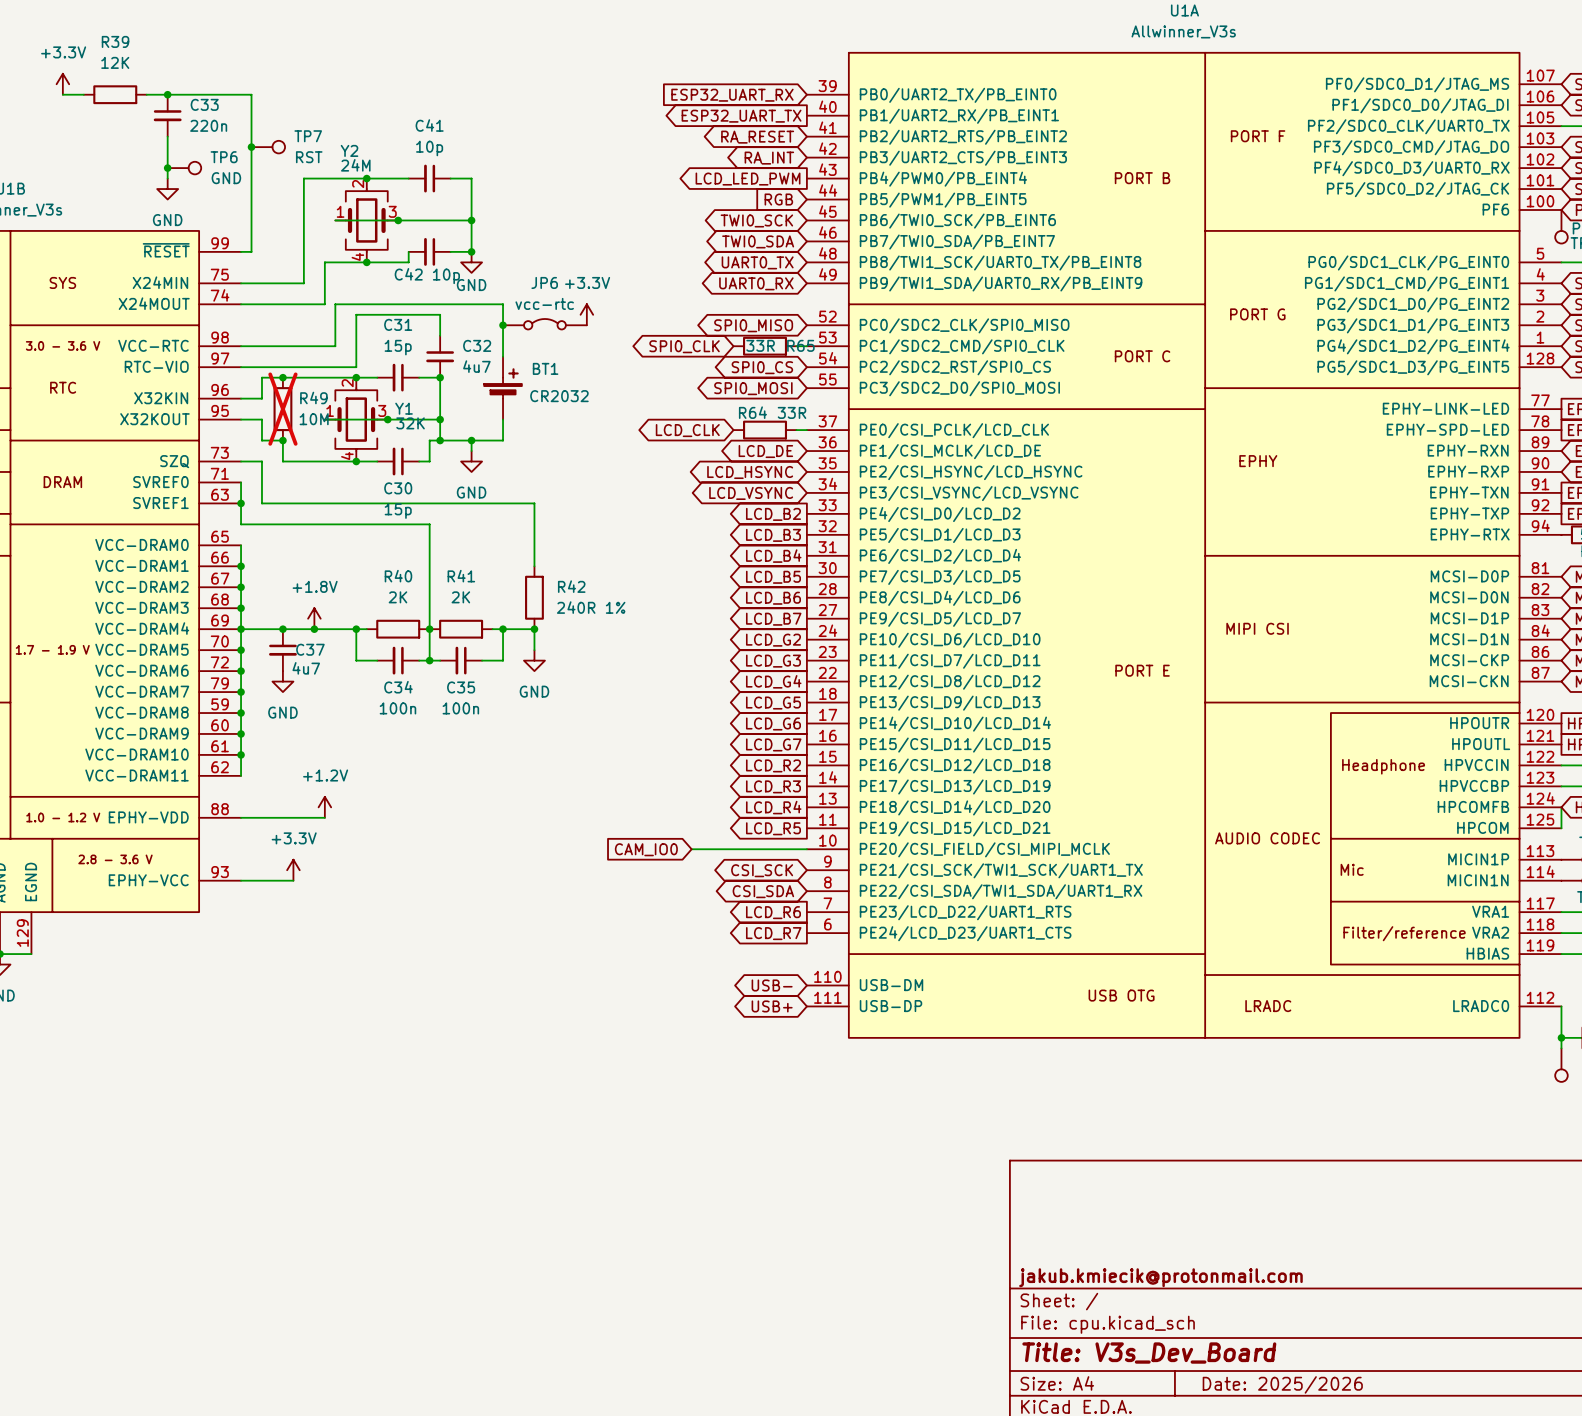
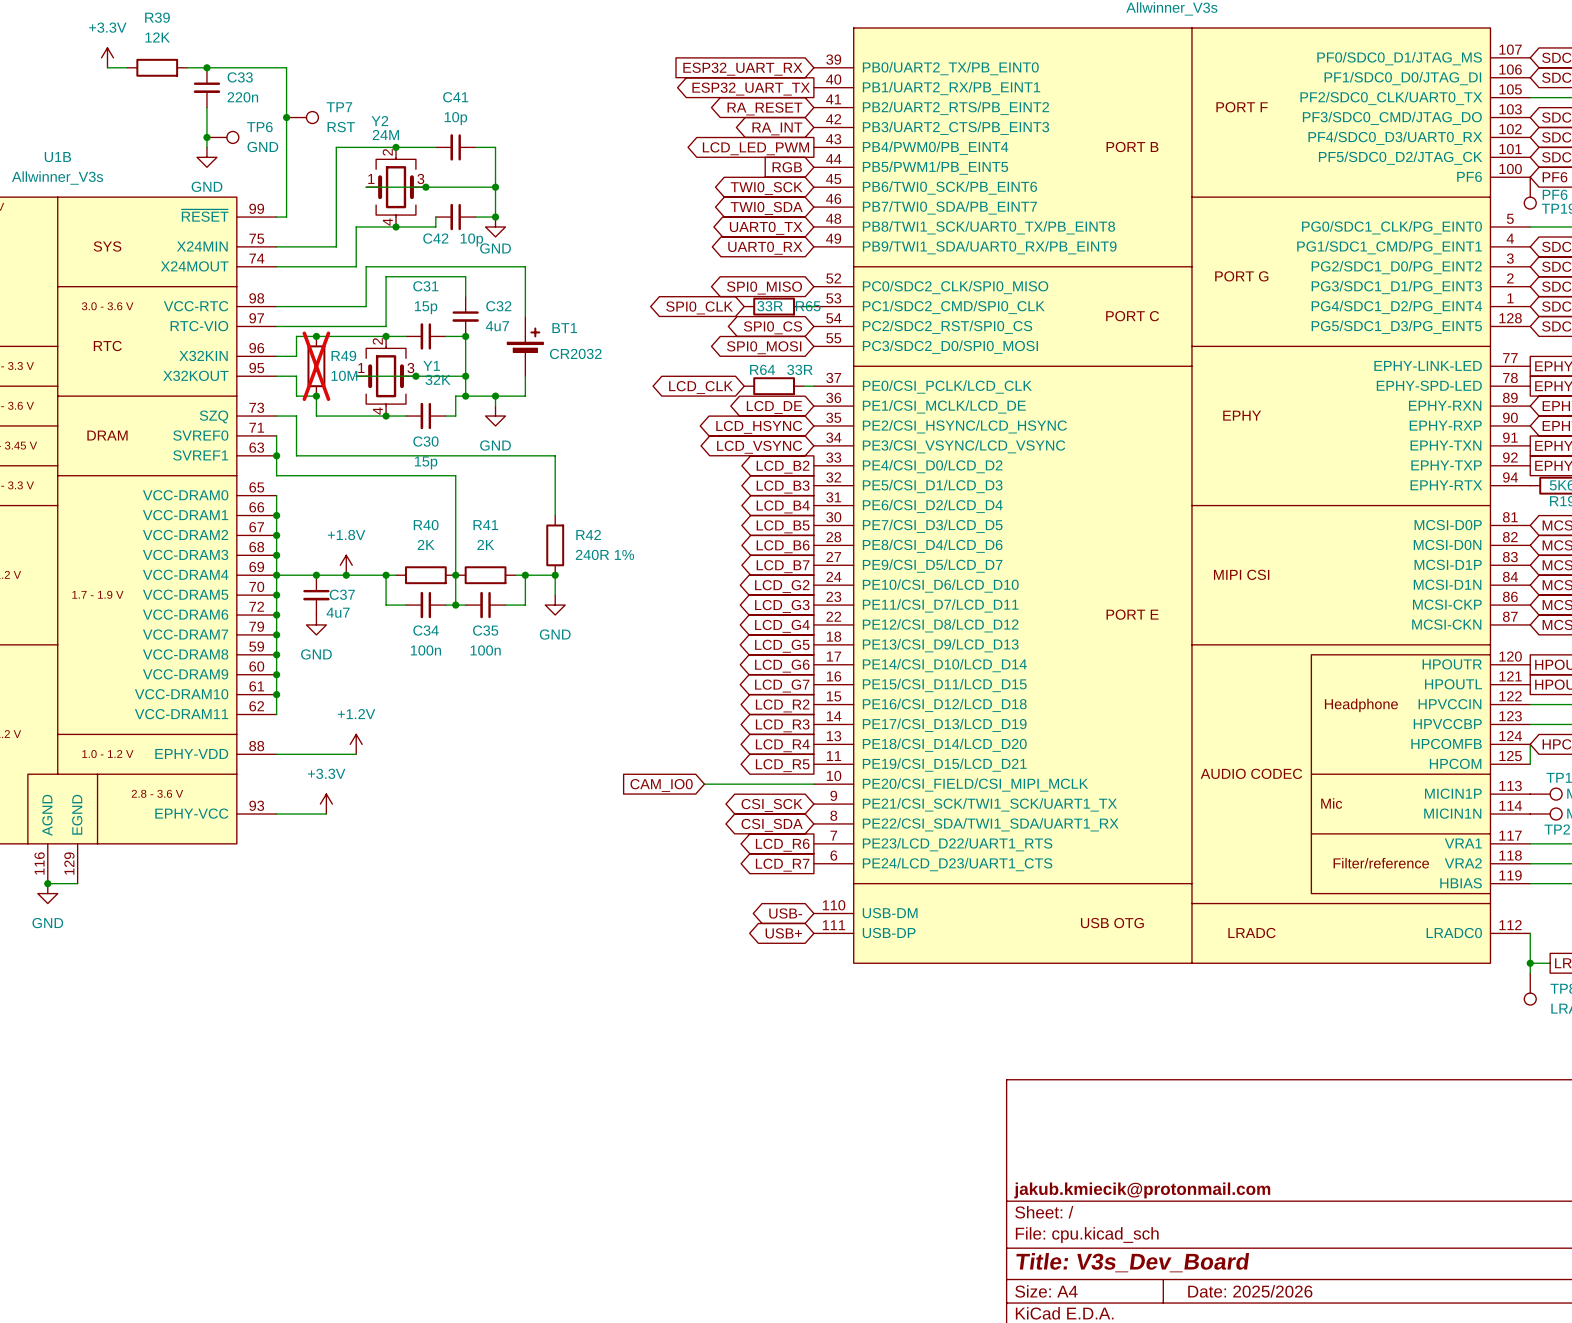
power symbol: +3.3V (586, 314) -> none
JP6: vcc-rtc (544, 324) -> none
junction: (503, 325) -> none

